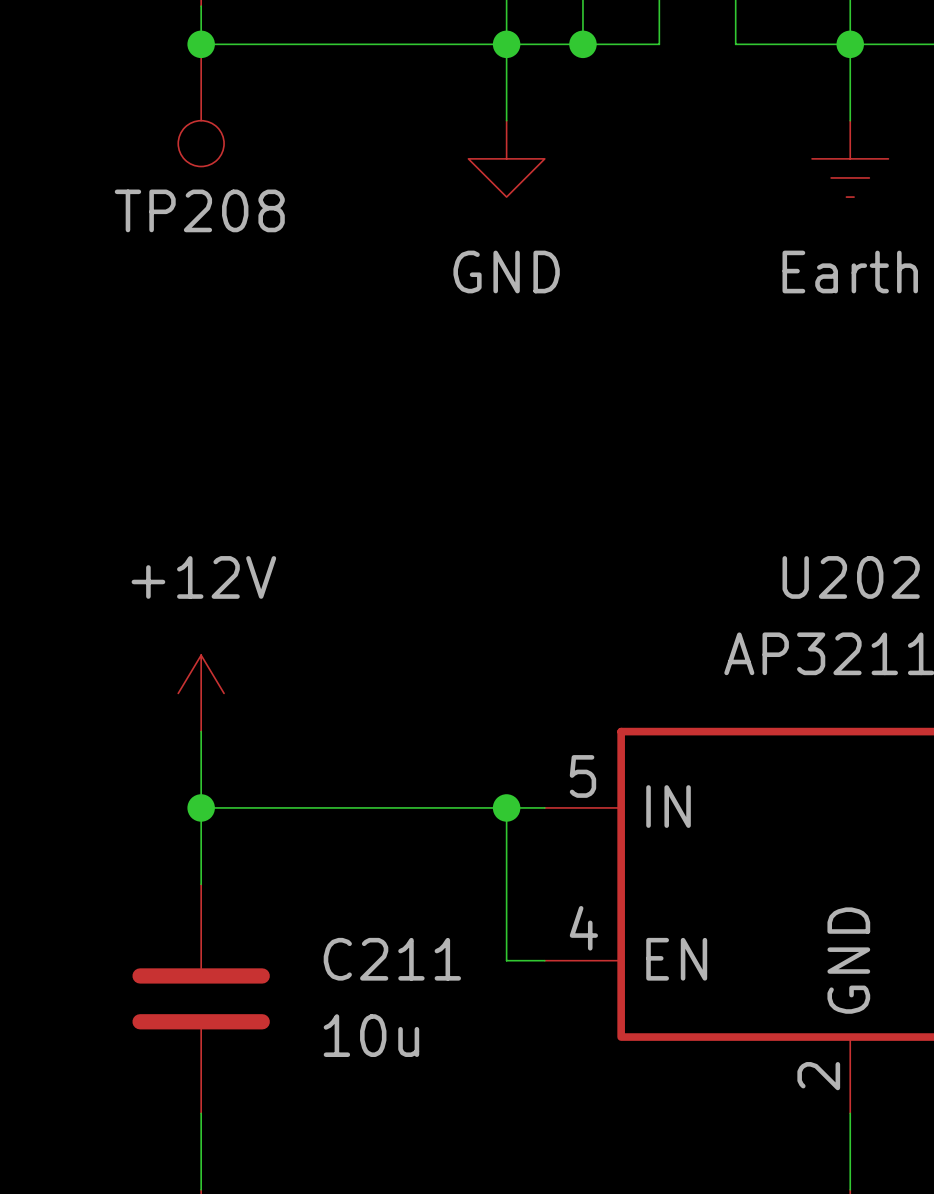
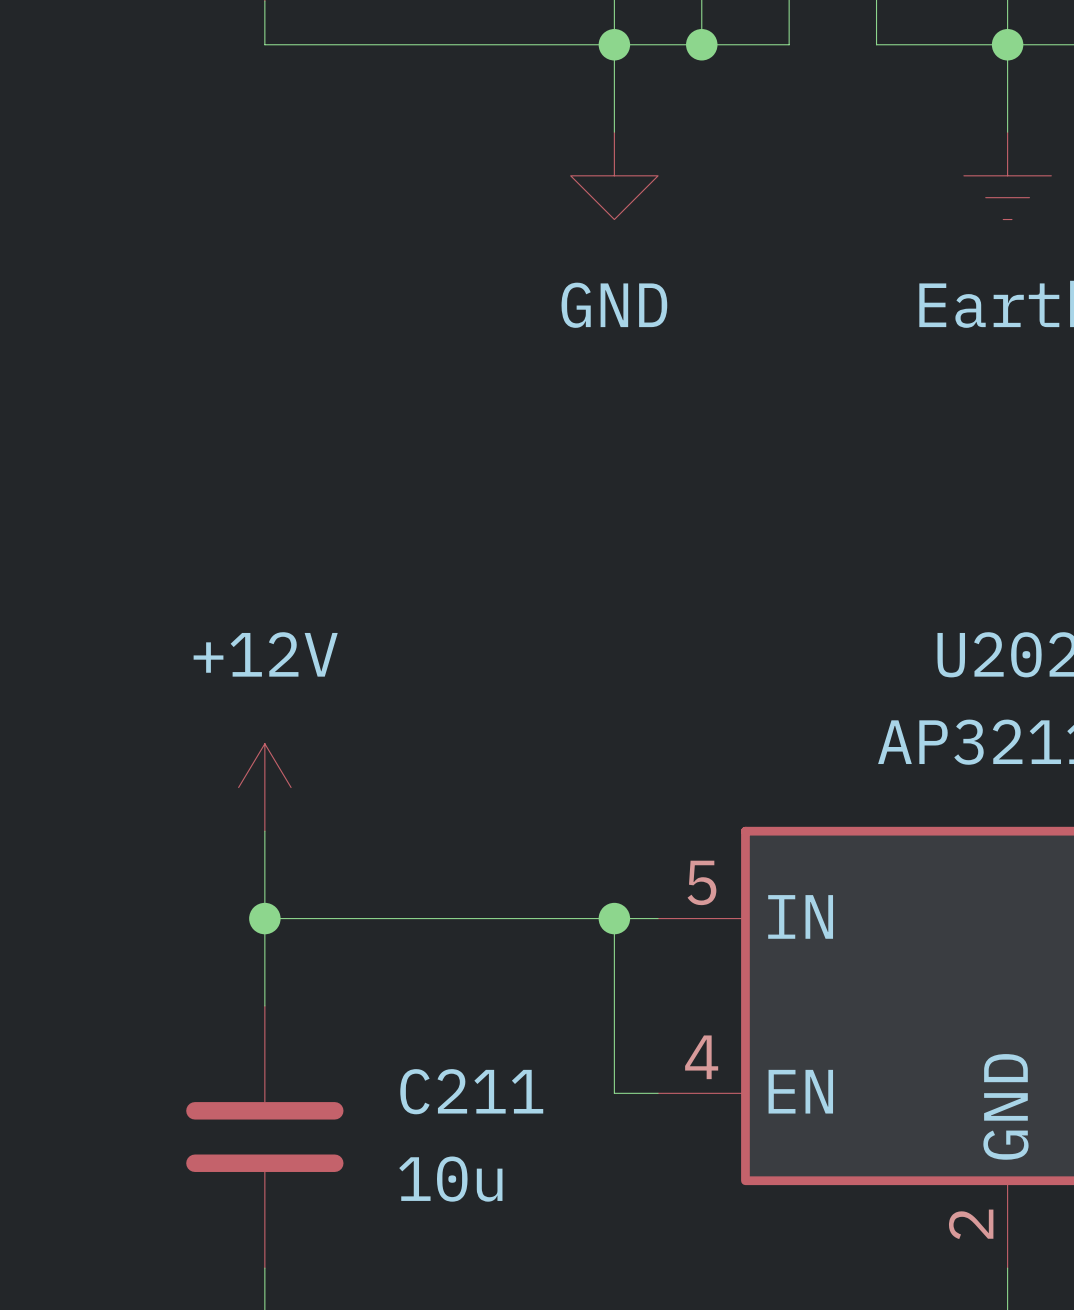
junction: (201, 44) -> none
TP208: (201, 105) -> none

